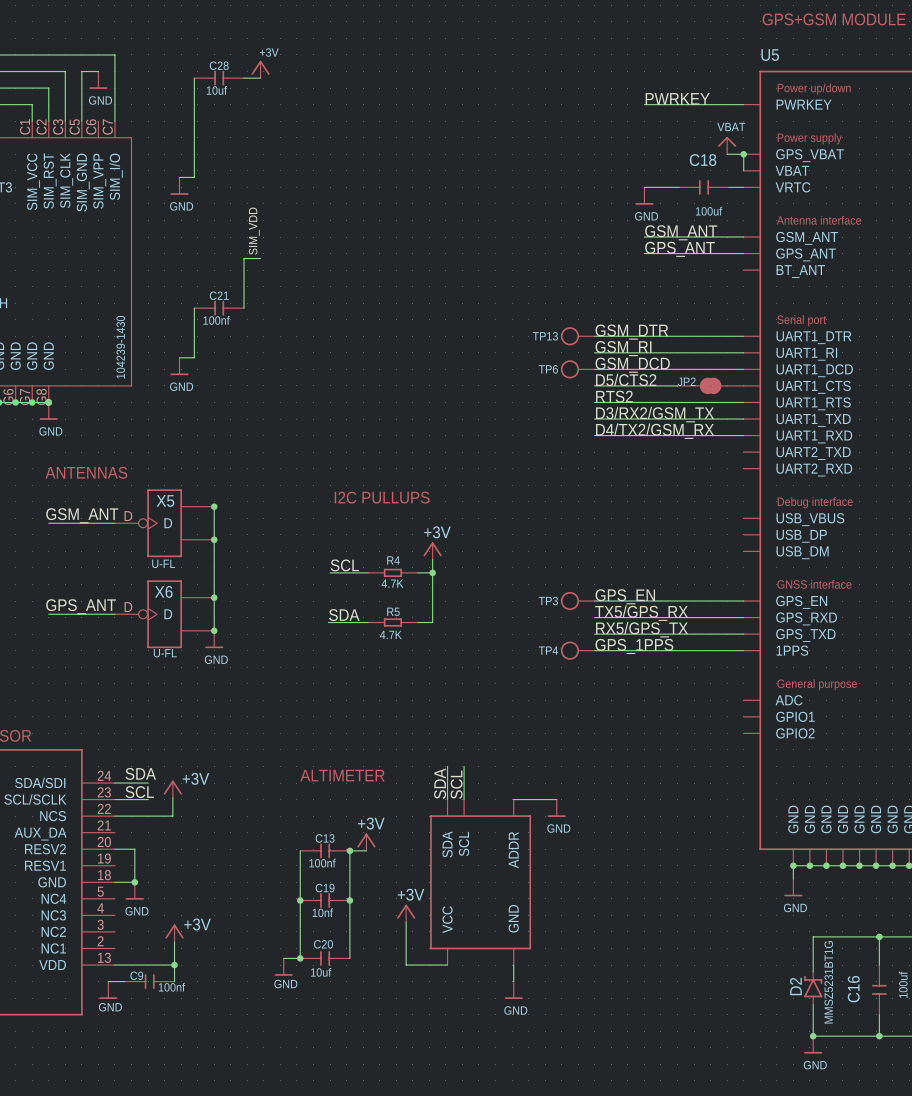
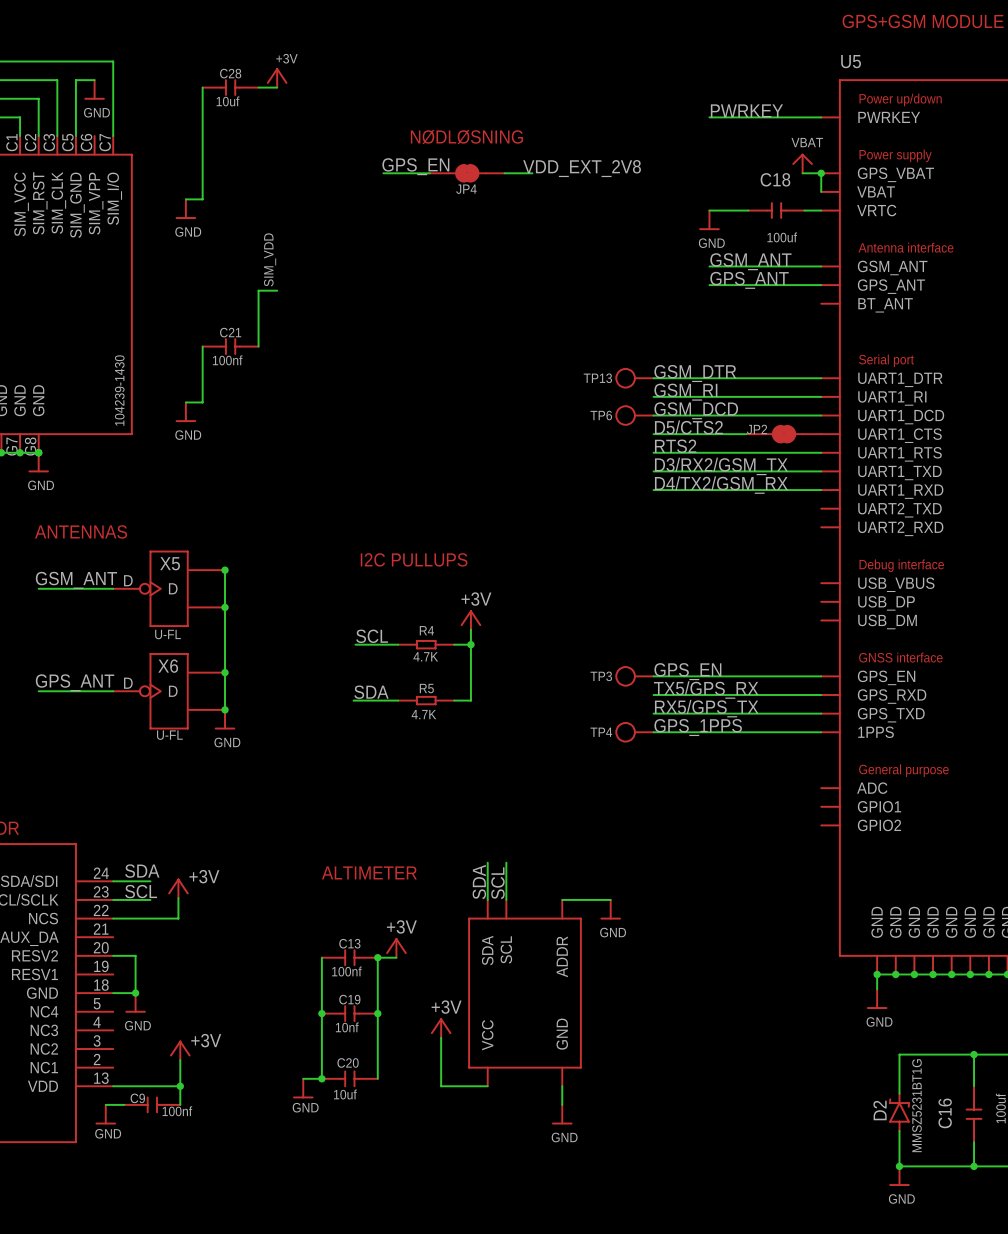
text: none -> NØDLØSNING (466, 136)
label: none -> GPS_EN (415, 166)
label: none -> VDD_EXT_2V8 (582, 168)
wire: none -> (383, 173) (429, 173)
JP4: none -> (467, 173)
wire: none -> (504, 173) (532, 173)

